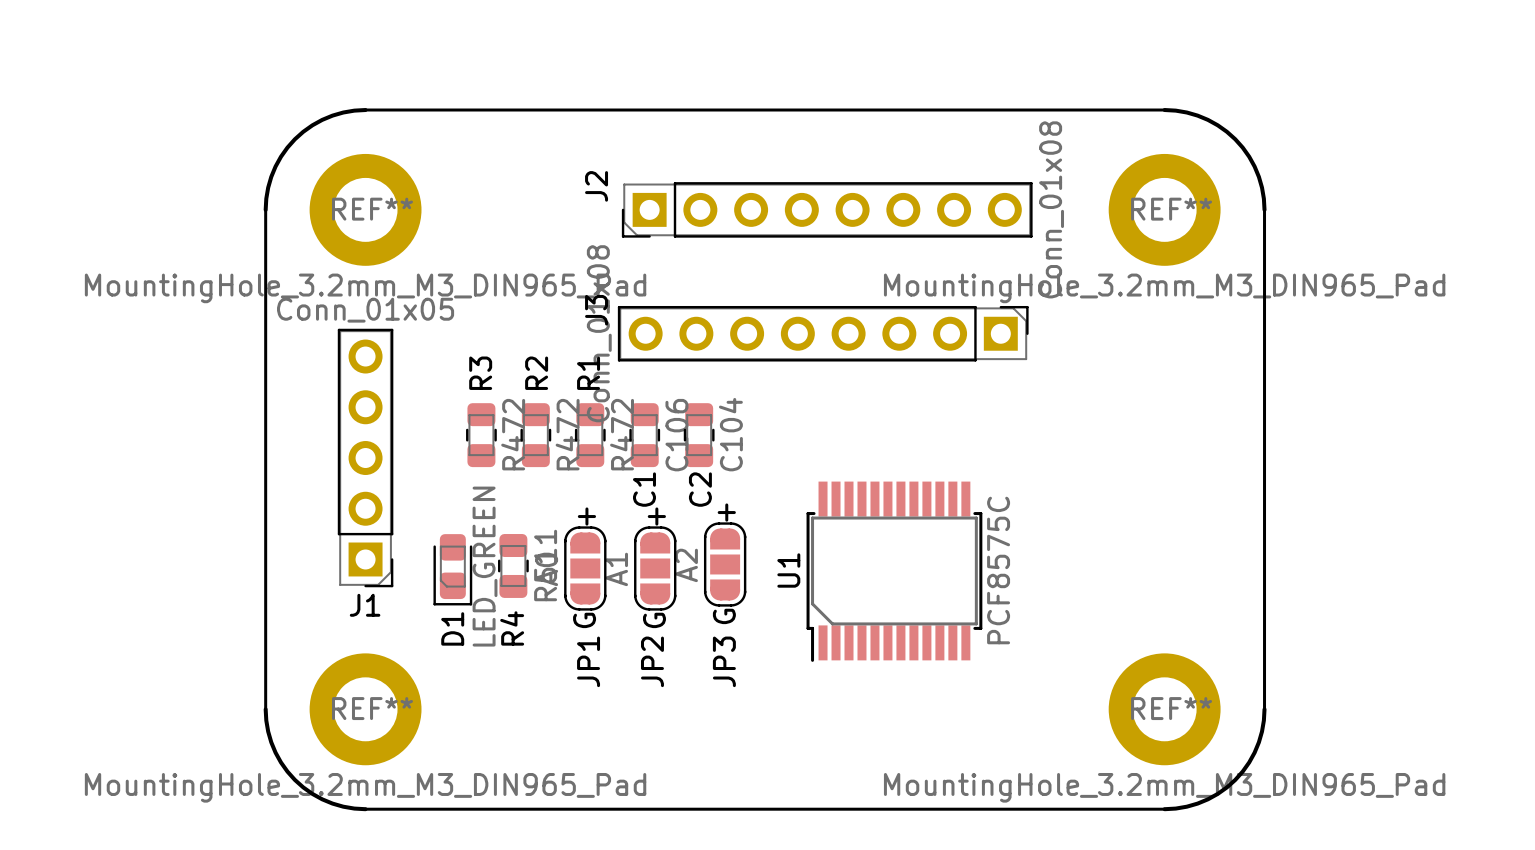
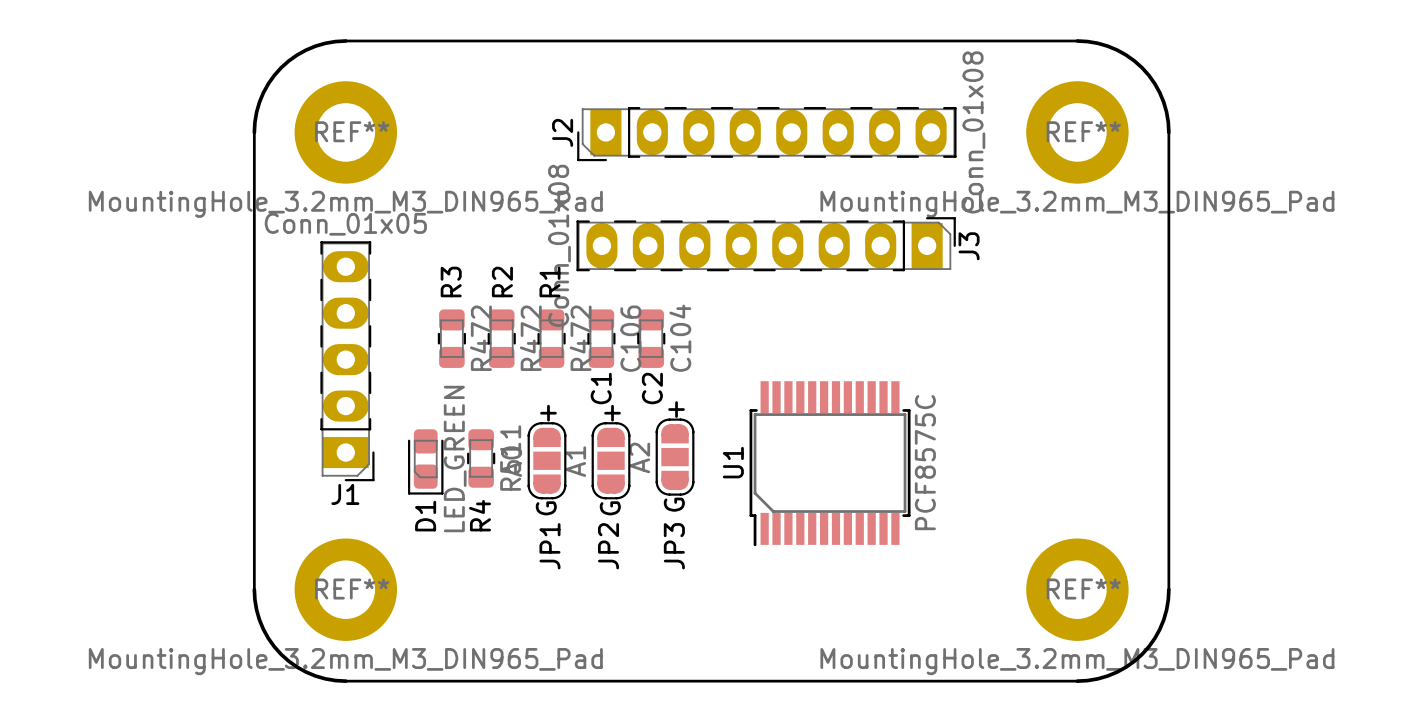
J2 footprint: [621, 182, 1033, 238] -> [577, 107, 957, 162]
J3 footprint: [617, 305, 1029, 362] -> [576, 217, 956, 272]
J3 name position: J3 (596, 310) -> J3 (969, 246)
J1 footprint: [337, 328, 394, 588] -> [320, 241, 375, 482]

